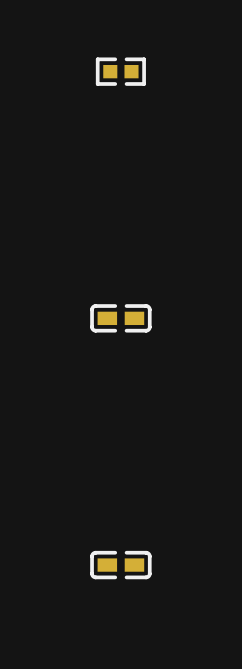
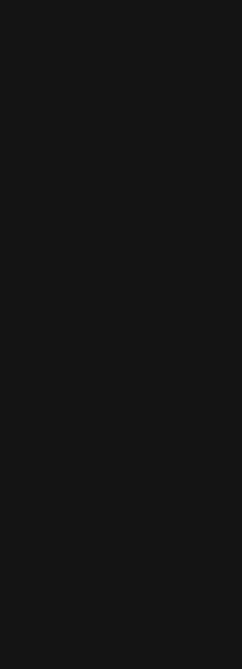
part: (120, 71) -> none
part: (120, 318) -> none
part: (120, 565) -> none

